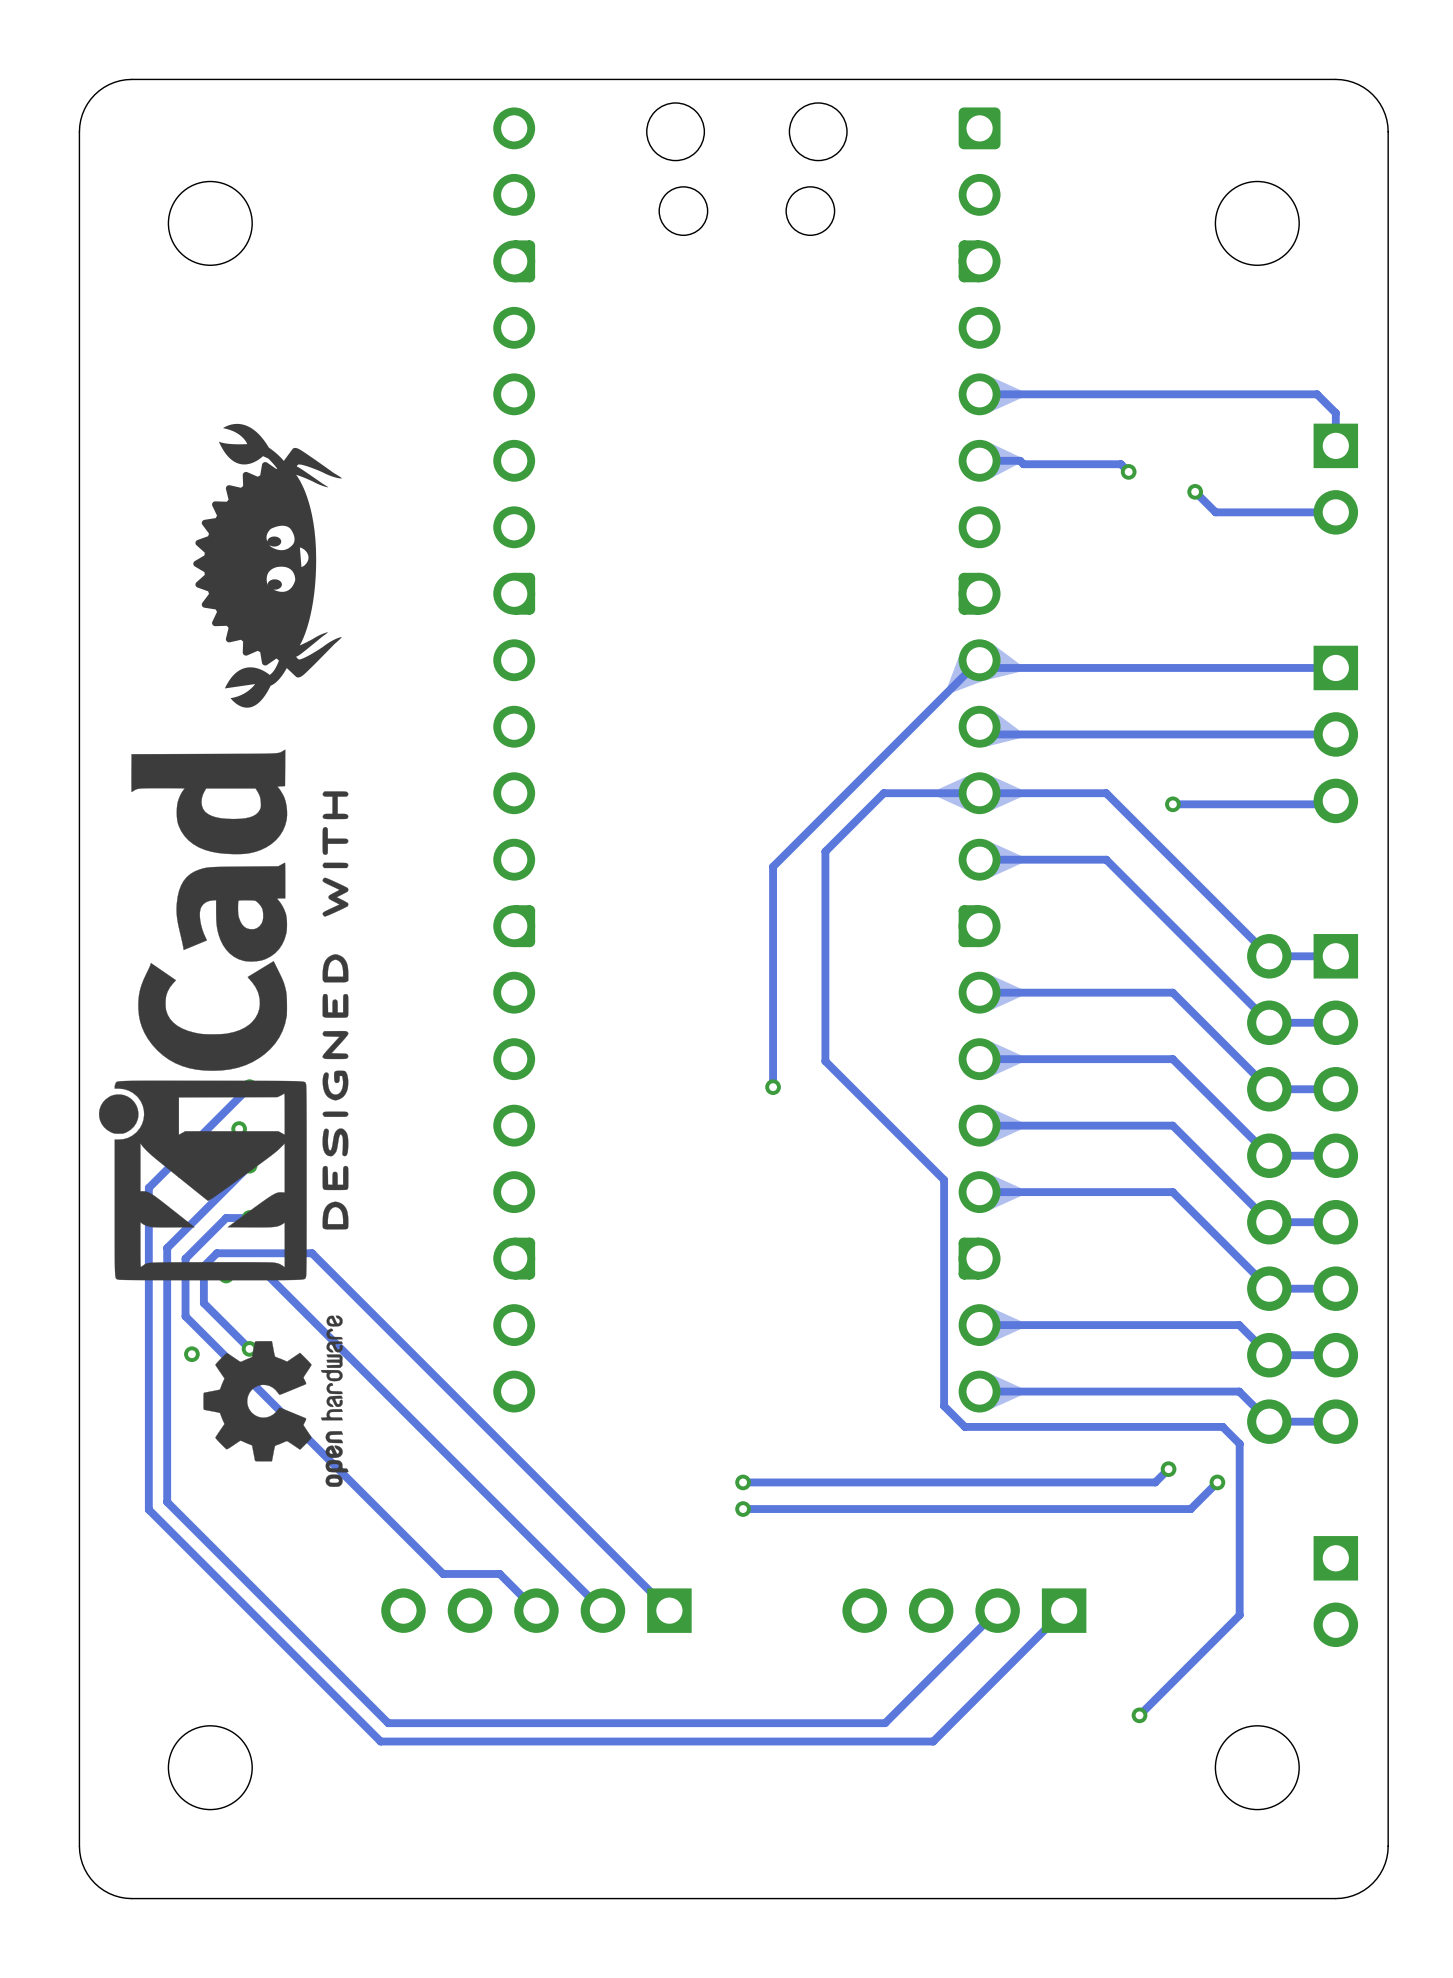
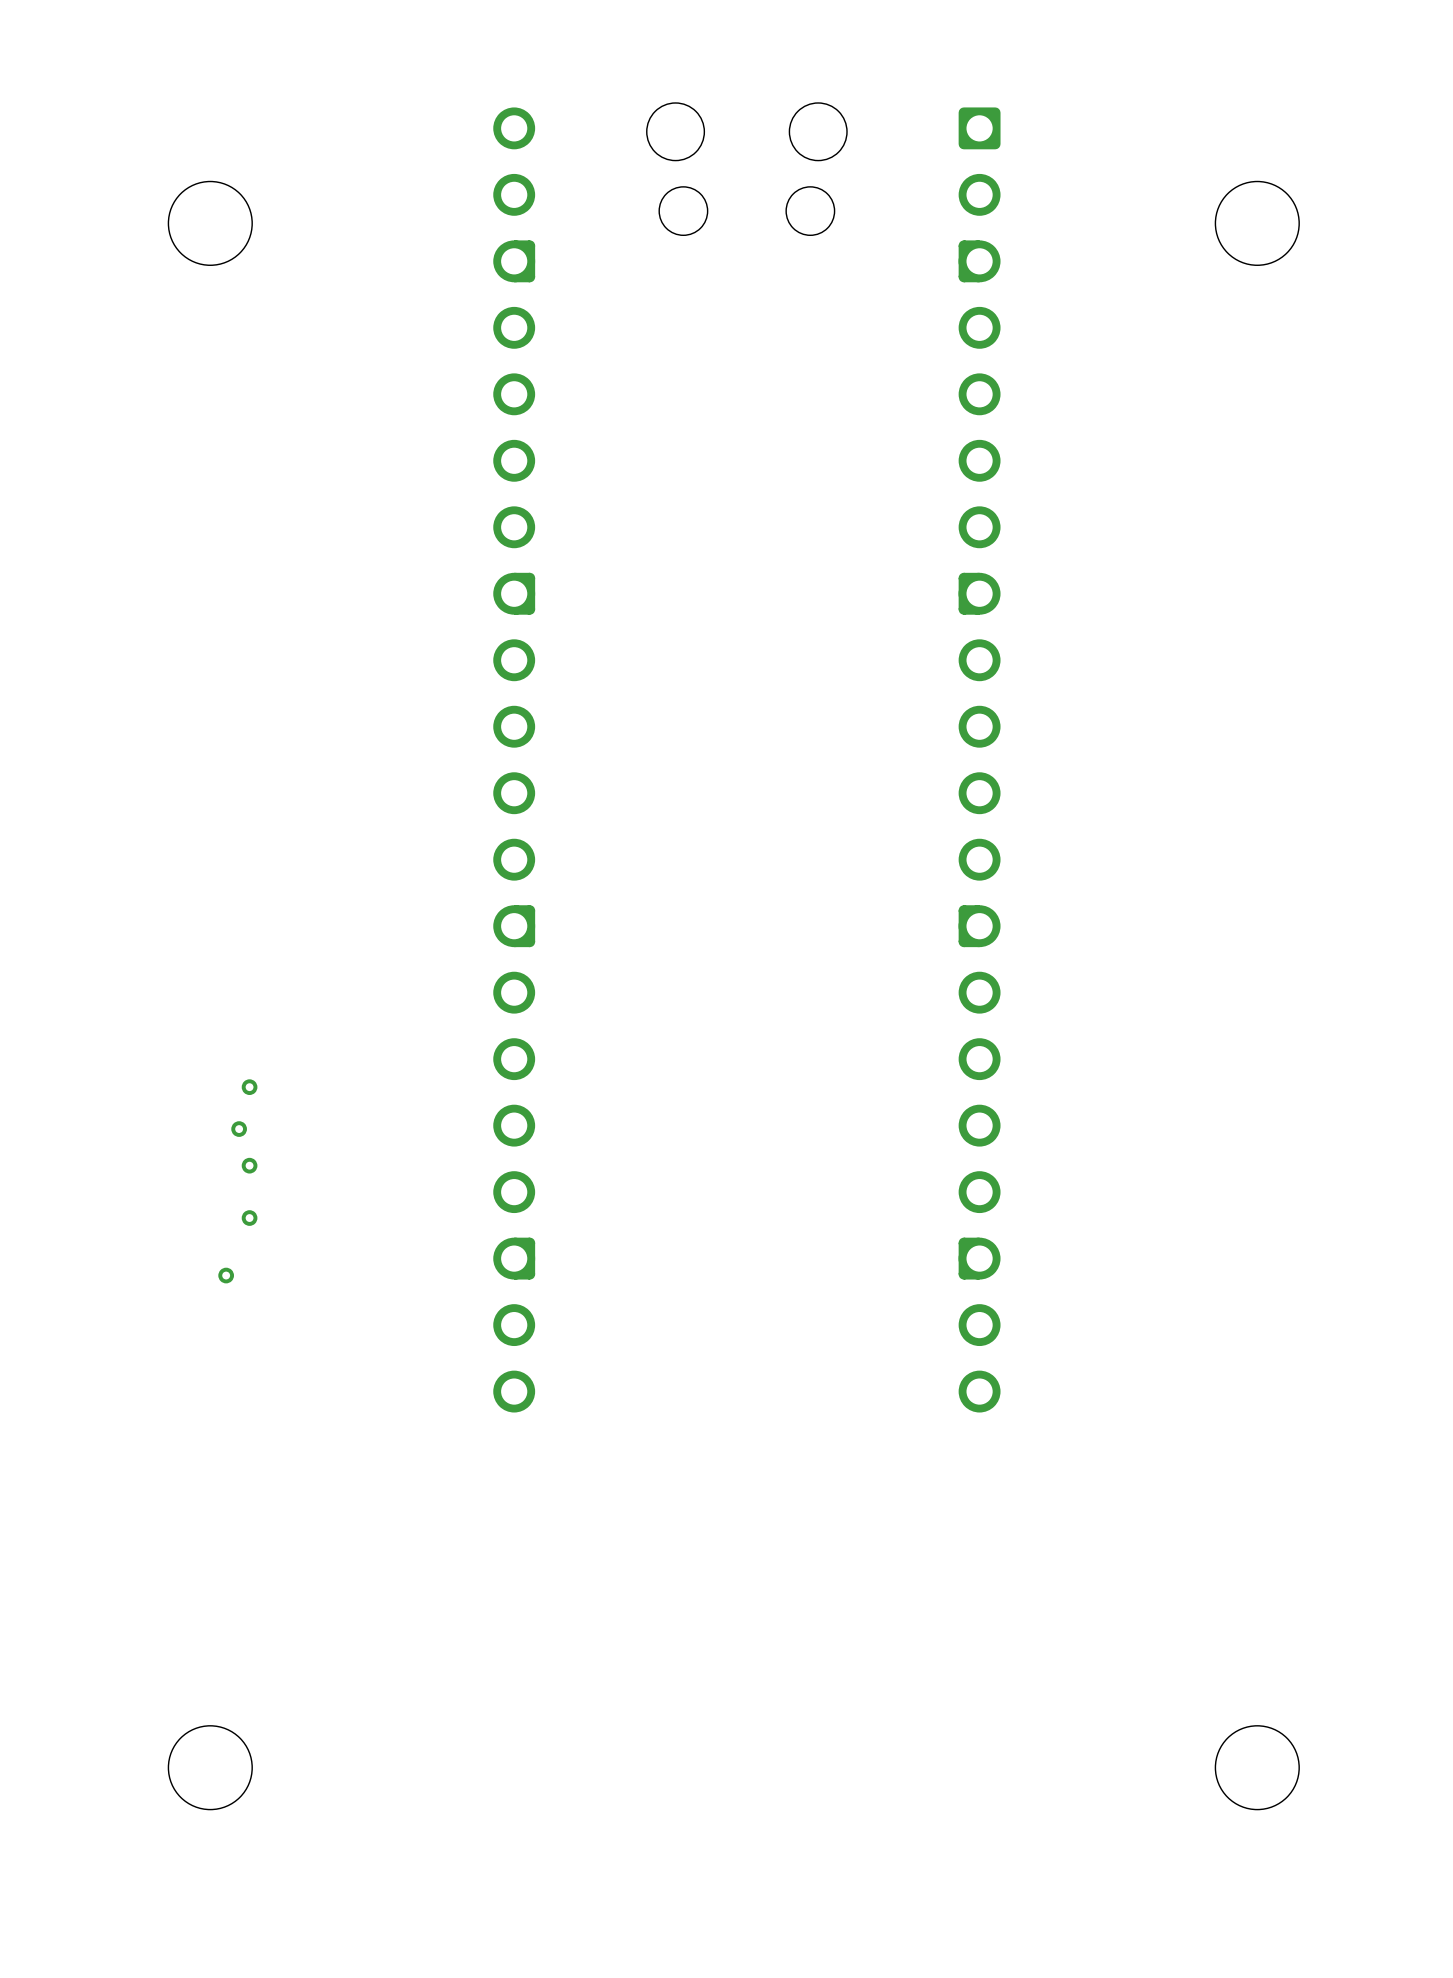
board edge: (1335, 79) (131, 79) (109, 84) (99, 90) (87, 103) (82, 114) (79, 131) (79, 1846) (84, 1868) (90, 1878) (103, 1890) (114, 1895) (131, 1898) (1335, 1898) (1358, 1893) (1368, 1887) (1380, 1874) (1385, 1863) (1388, 1846) (1388, 131) (1385, 114) (1372, 94) (1353, 82) (1335, 79) -> none
track: (979, 394) (1317, 394) (1335, 413) (1335, 445) -> none
drawing: [193, 423, 342, 708] -> none
track: (979, 460) (1020, 460) (1023, 464) (1121, 464) (1128, 471) -> none
via: (1128, 471) -> none
part: (1335, 479) -> none
track: (1195, 491) (1215, 512) (1335, 512) -> none
via: (1195, 491) -> none
track: (1335, 667) (987, 667) (979, 660) (773, 866) (773, 1087) -> none
track: (979, 726) (987, 734) (1335, 734) -> none
part: (1335, 734) -> none
drawing: [98, 749, 349, 1281] -> none
track: (1335, 800) (1332, 804) (1172, 804) -> none
via: (1172, 804) -> none
track: (979, 859) (1106, 859) (1269, 1022) (1335, 1022) -> none
track: (1335, 956) (1269, 956) (1106, 793) (883, 793) (825, 851) (825, 1061) (944, 1179) (944, 1406) (964, 1426) (1222, 1426) (1239, 1443) (1239, 1615) (1139, 1715) -> none
track: (979, 992) (1172, 992) (1269, 1089) (1335, 1089) -> none
track: (979, 1059) (1172, 1059) (1269, 1155) (1335, 1155) -> none
track: (249, 1087) (148, 1187) (148, 1509) (380, 1741) (933, 1741) (1064, 1610) -> none
via: (773, 1087) -> none
track: (979, 1125) (1172, 1125) (1269, 1222) (1335, 1222) -> none
track: (249, 1165) (167, 1248) (167, 1502) (388, 1723) (885, 1723) (997, 1610) -> none
part: (1302, 1188) -> none
track: (979, 1192) (1172, 1192) (1269, 1288) (1335, 1288) -> none
track: (249, 1218) (226, 1218) (185, 1258) (185, 1316) (443, 1573) (499, 1573) (536, 1610) -> none
track: (226, 1275) (267, 1275) (602, 1610) -> none
drawing: [203, 1315, 349, 1487] -> none
track: (979, 1325) (1239, 1325) (1269, 1355) (1335, 1355) -> none
track: (249, 1348) (203, 1303) (203, 1266) (216, 1253) (312, 1253) (669, 1610) -> none
via: (249, 1348) -> none
via: (191, 1354) -> none
track: (979, 1391) (1239, 1391) (1269, 1421) (1335, 1421) -> none
track: (1168, 1469) (1155, 1482) (743, 1482) -> none
via: (1168, 1469) -> none
via: (743, 1482) -> none
track: (1217, 1482) (1190, 1509) (743, 1509) -> none
via: (1217, 1482) -> none
via: (743, 1509) -> none
part: (1335, 1591) -> none
part: (536, 1610) -> none
part: (964, 1610) -> none
via: (1139, 1715) -> none

